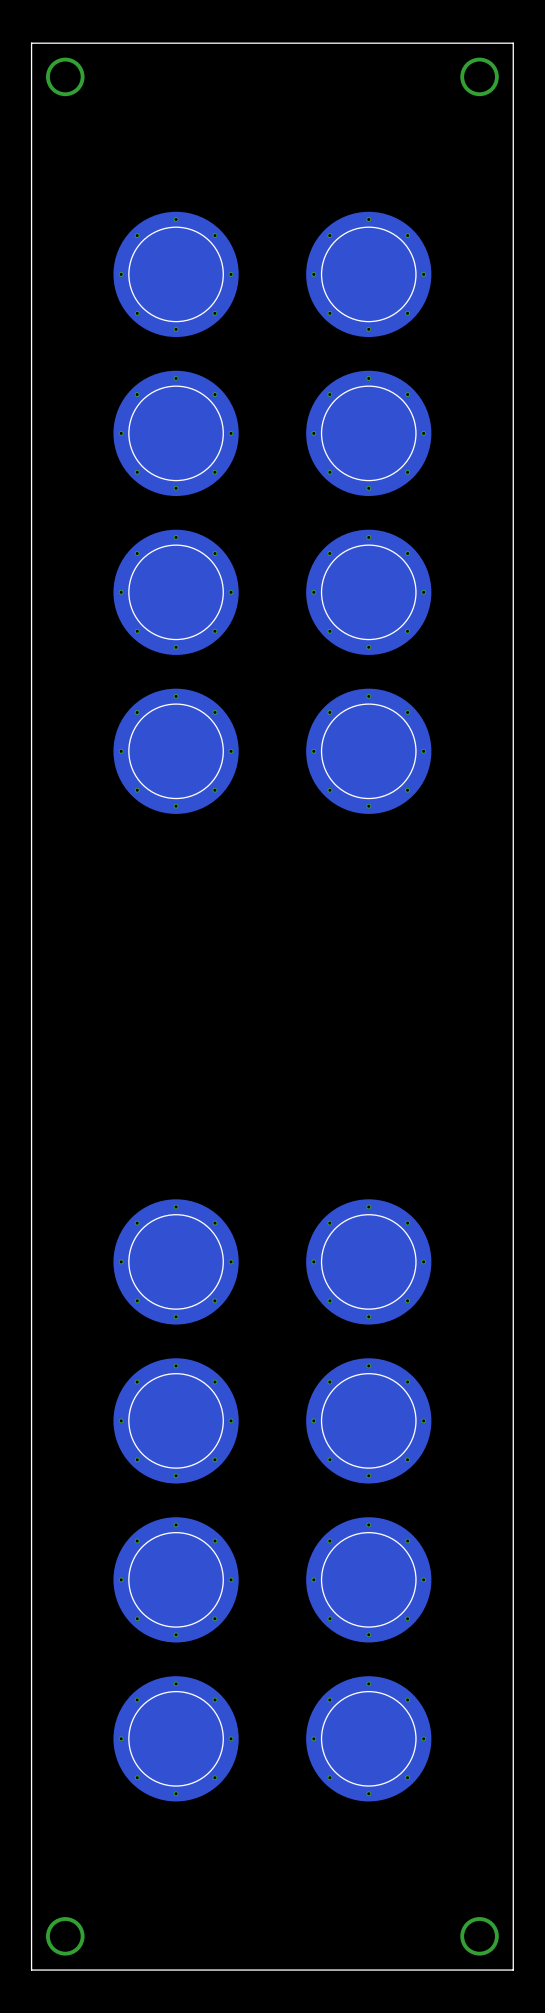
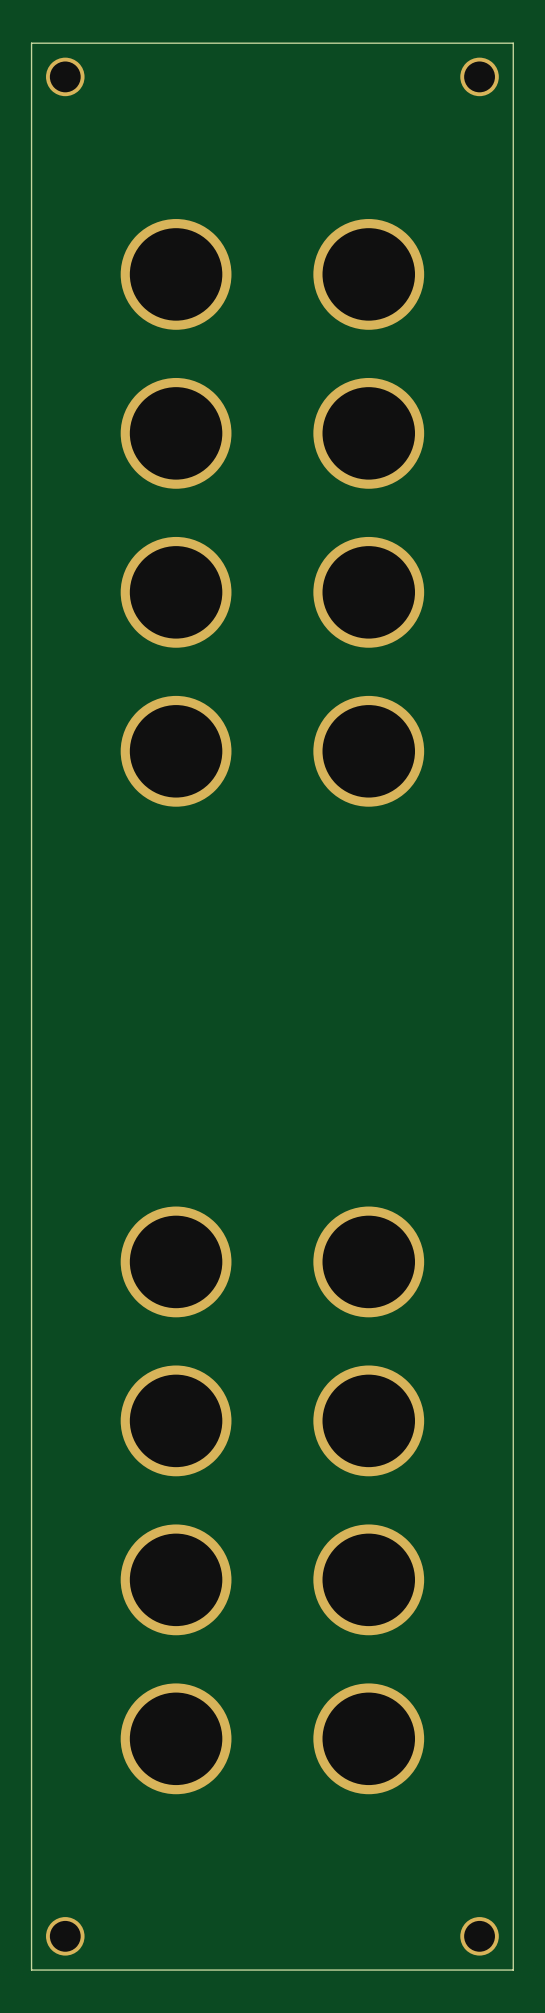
part footprint: [113, 211, 239, 338] -> [120, 219, 232, 330]
part footprint: [306, 211, 432, 338] -> [313, 219, 425, 330]
part footprint: [113, 370, 239, 496] -> [120, 377, 232, 489]
part footprint: [306, 370, 432, 496] -> [313, 377, 425, 489]
part footprint: [113, 529, 239, 655] -> [120, 536, 232, 648]
part footprint: [306, 529, 432, 655] -> [313, 536, 425, 648]
part footprint: [113, 688, 239, 814] -> [120, 695, 232, 807]
part footprint: [306, 688, 432, 814] -> [313, 695, 425, 807]
part footprint: [113, 1199, 239, 1325] -> [120, 1206, 232, 1318]
part footprint: [306, 1199, 432, 1325] -> [313, 1206, 425, 1318]
part footprint: [113, 1358, 239, 1484] -> [120, 1365, 232, 1477]
part footprint: [306, 1358, 432, 1484] -> [313, 1365, 425, 1477]
part footprint: [113, 1517, 239, 1643] -> [120, 1524, 232, 1636]
part footprint: [306, 1517, 432, 1643] -> [313, 1524, 425, 1636]
part footprint: [113, 1676, 239, 1802] -> [120, 1683, 232, 1795]
part footprint: [306, 1676, 432, 1802] -> [313, 1683, 425, 1795]

